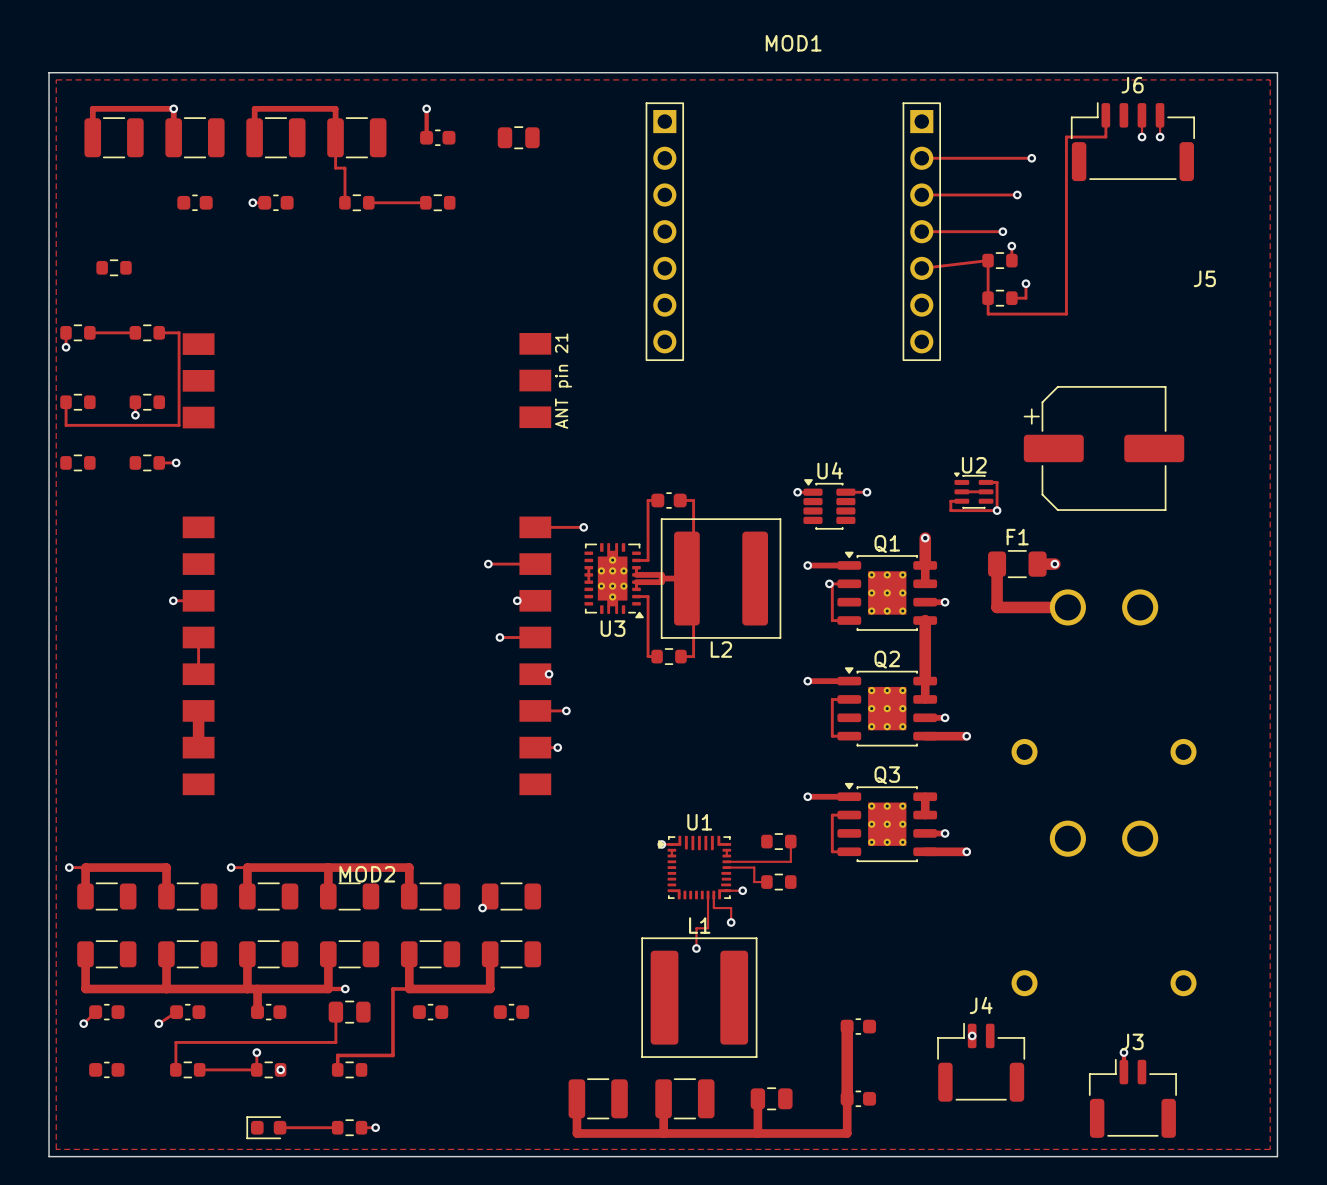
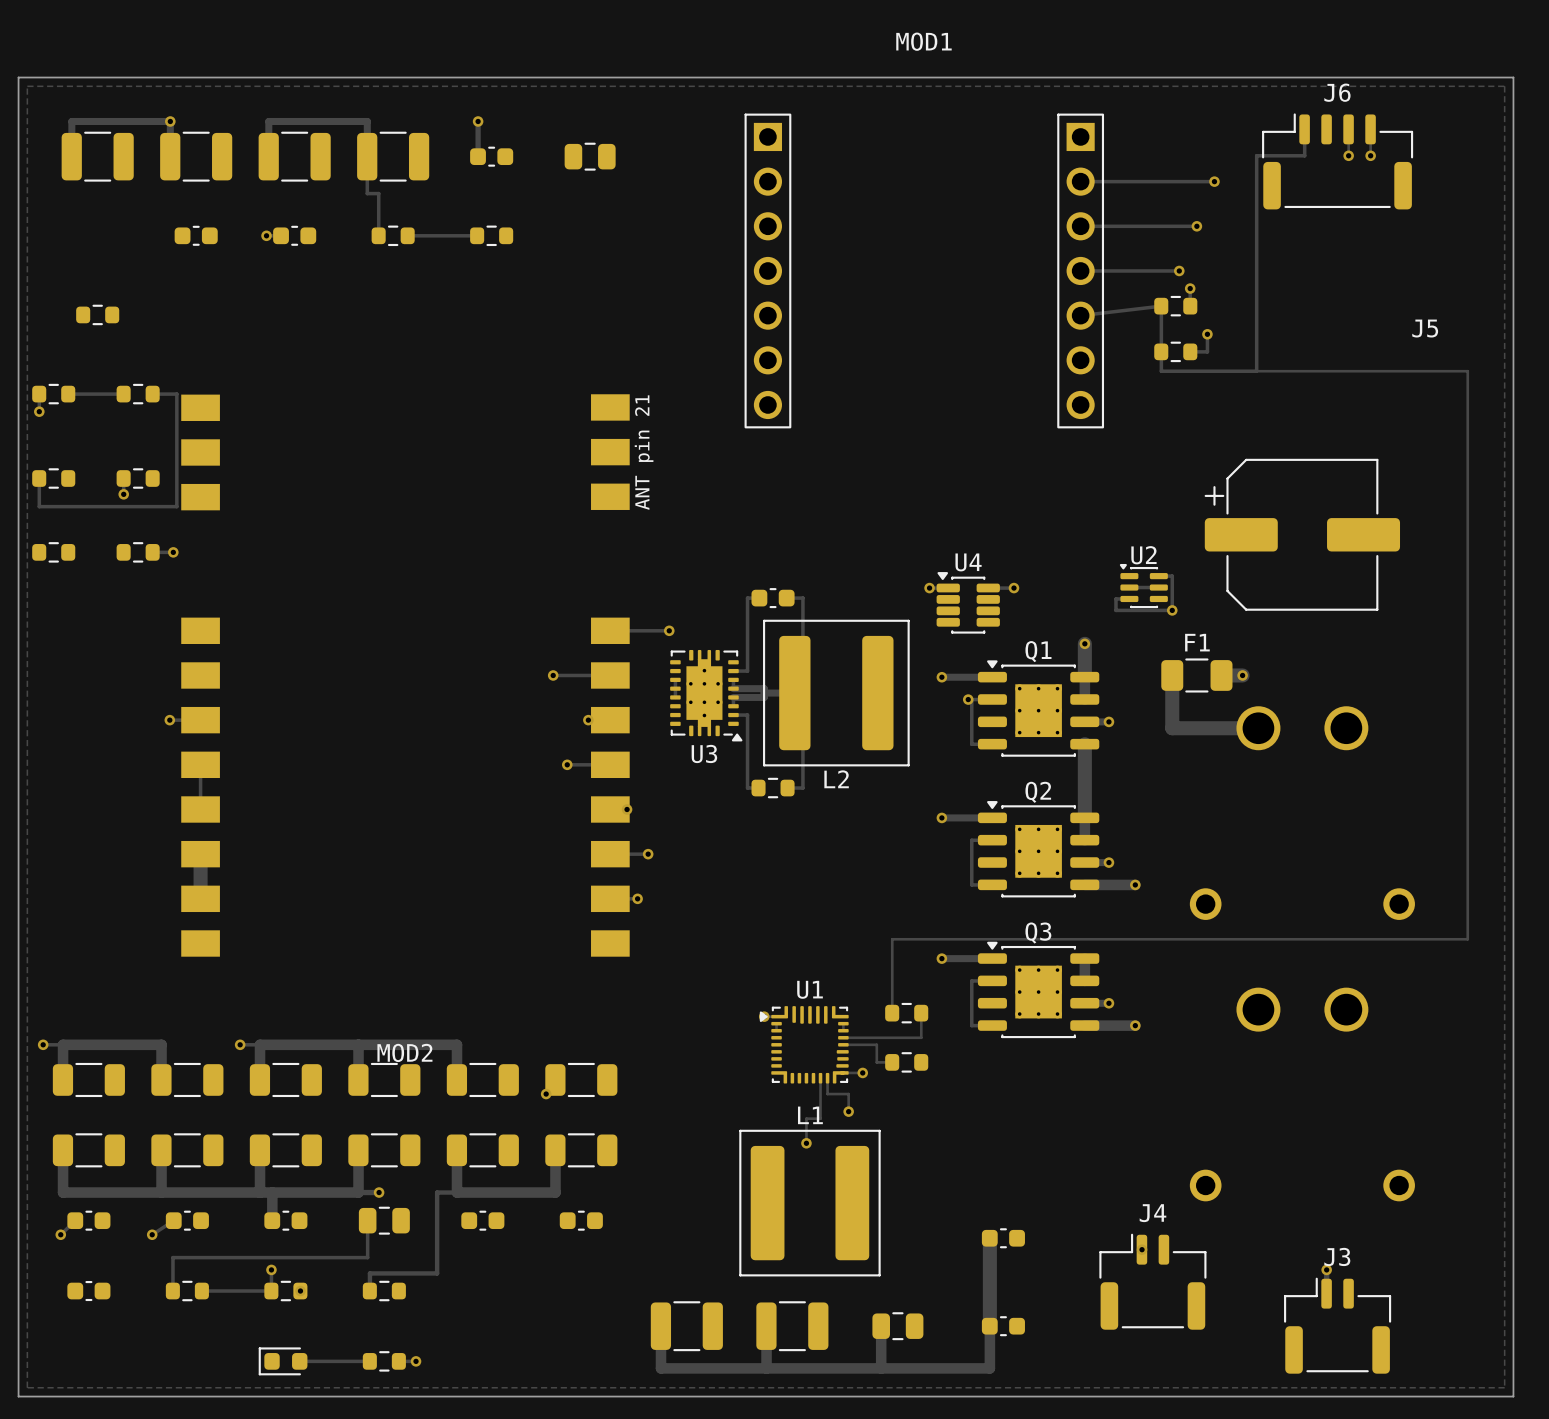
track: none -> (1256, 371) (1467, 371) (1467, 939) (892, 939) (892, 1013)

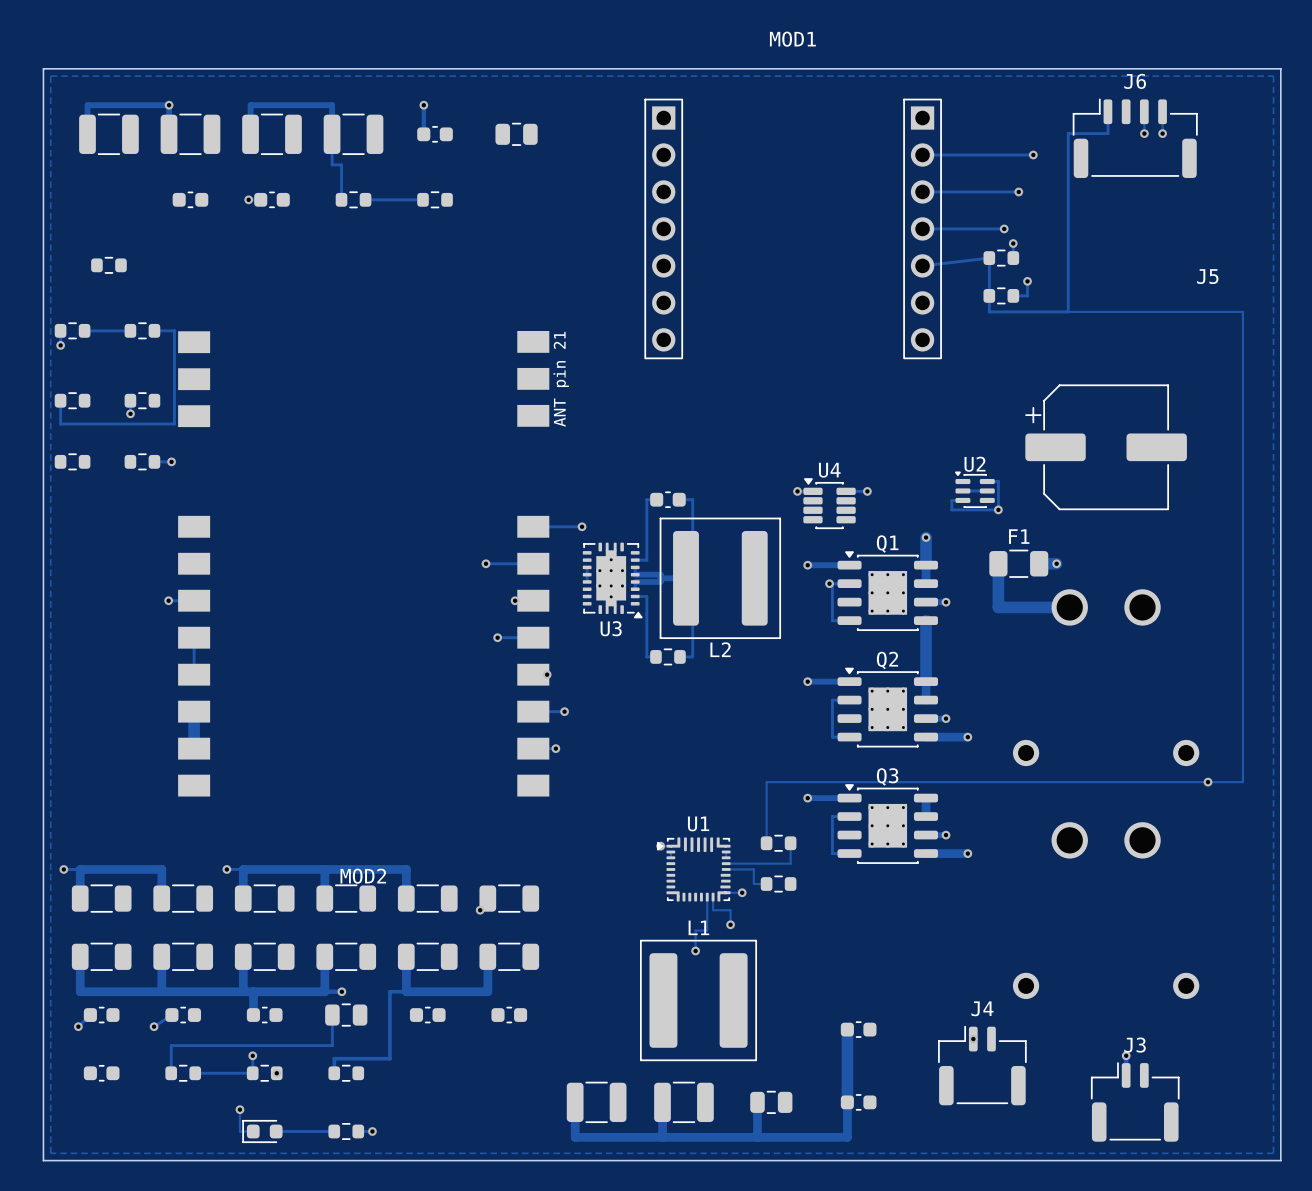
via: none -> (1208, 782)
track: none -> (239, 1109) (239, 1131) (253, 1131)
via: none -> (239, 1109)

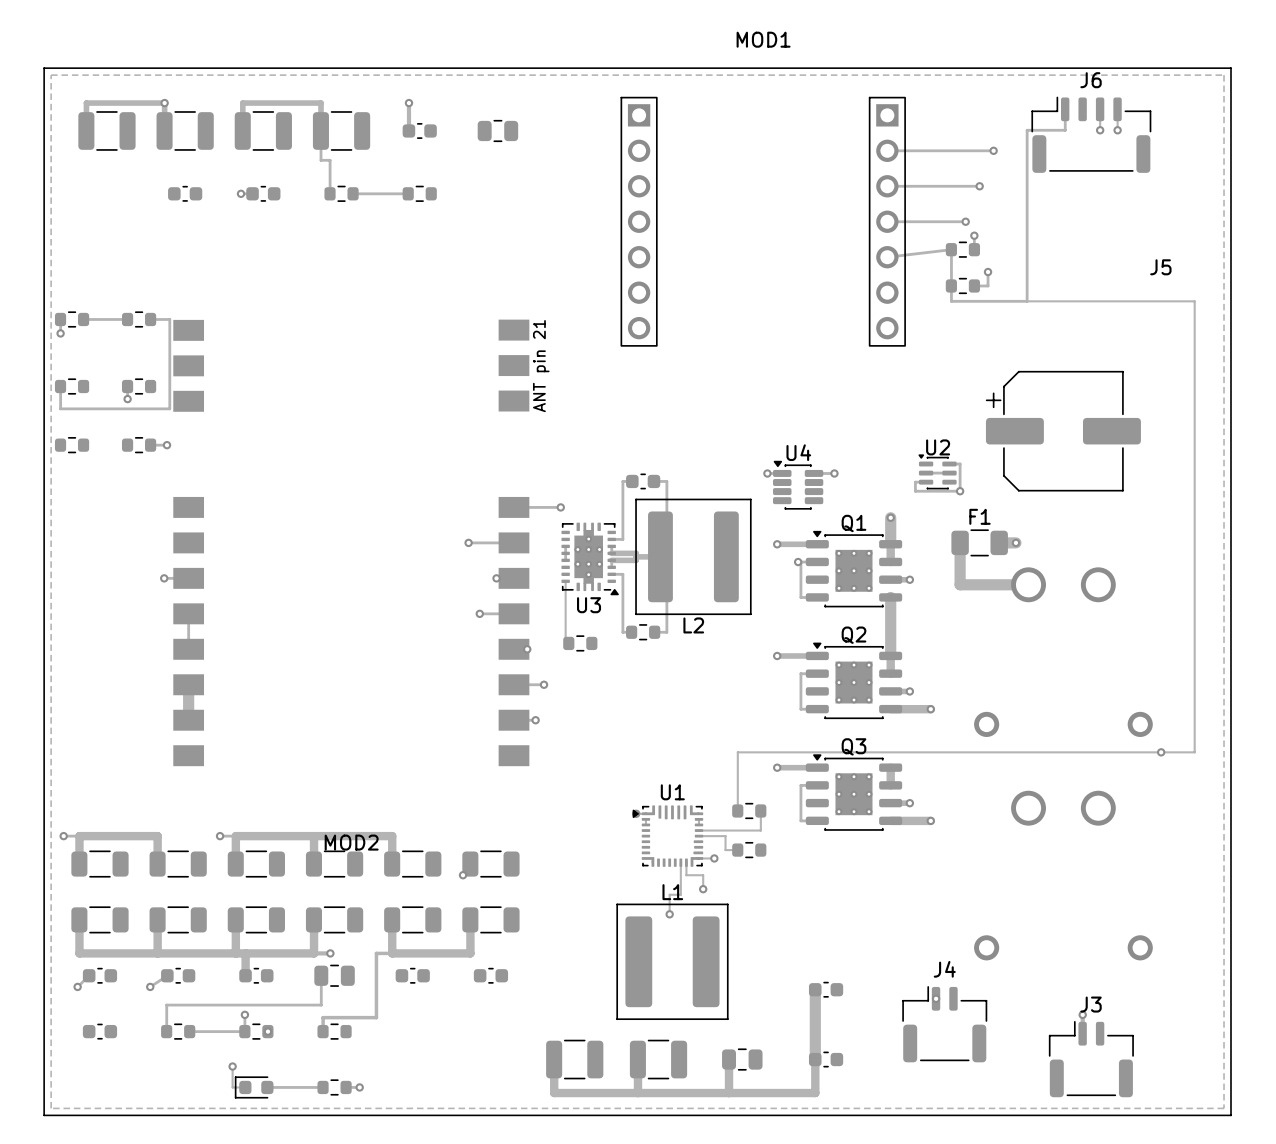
part: (108, 265) -> none
track: none -> (565, 581) (565, 643) (568, 643)
part: none -> (580, 643)

